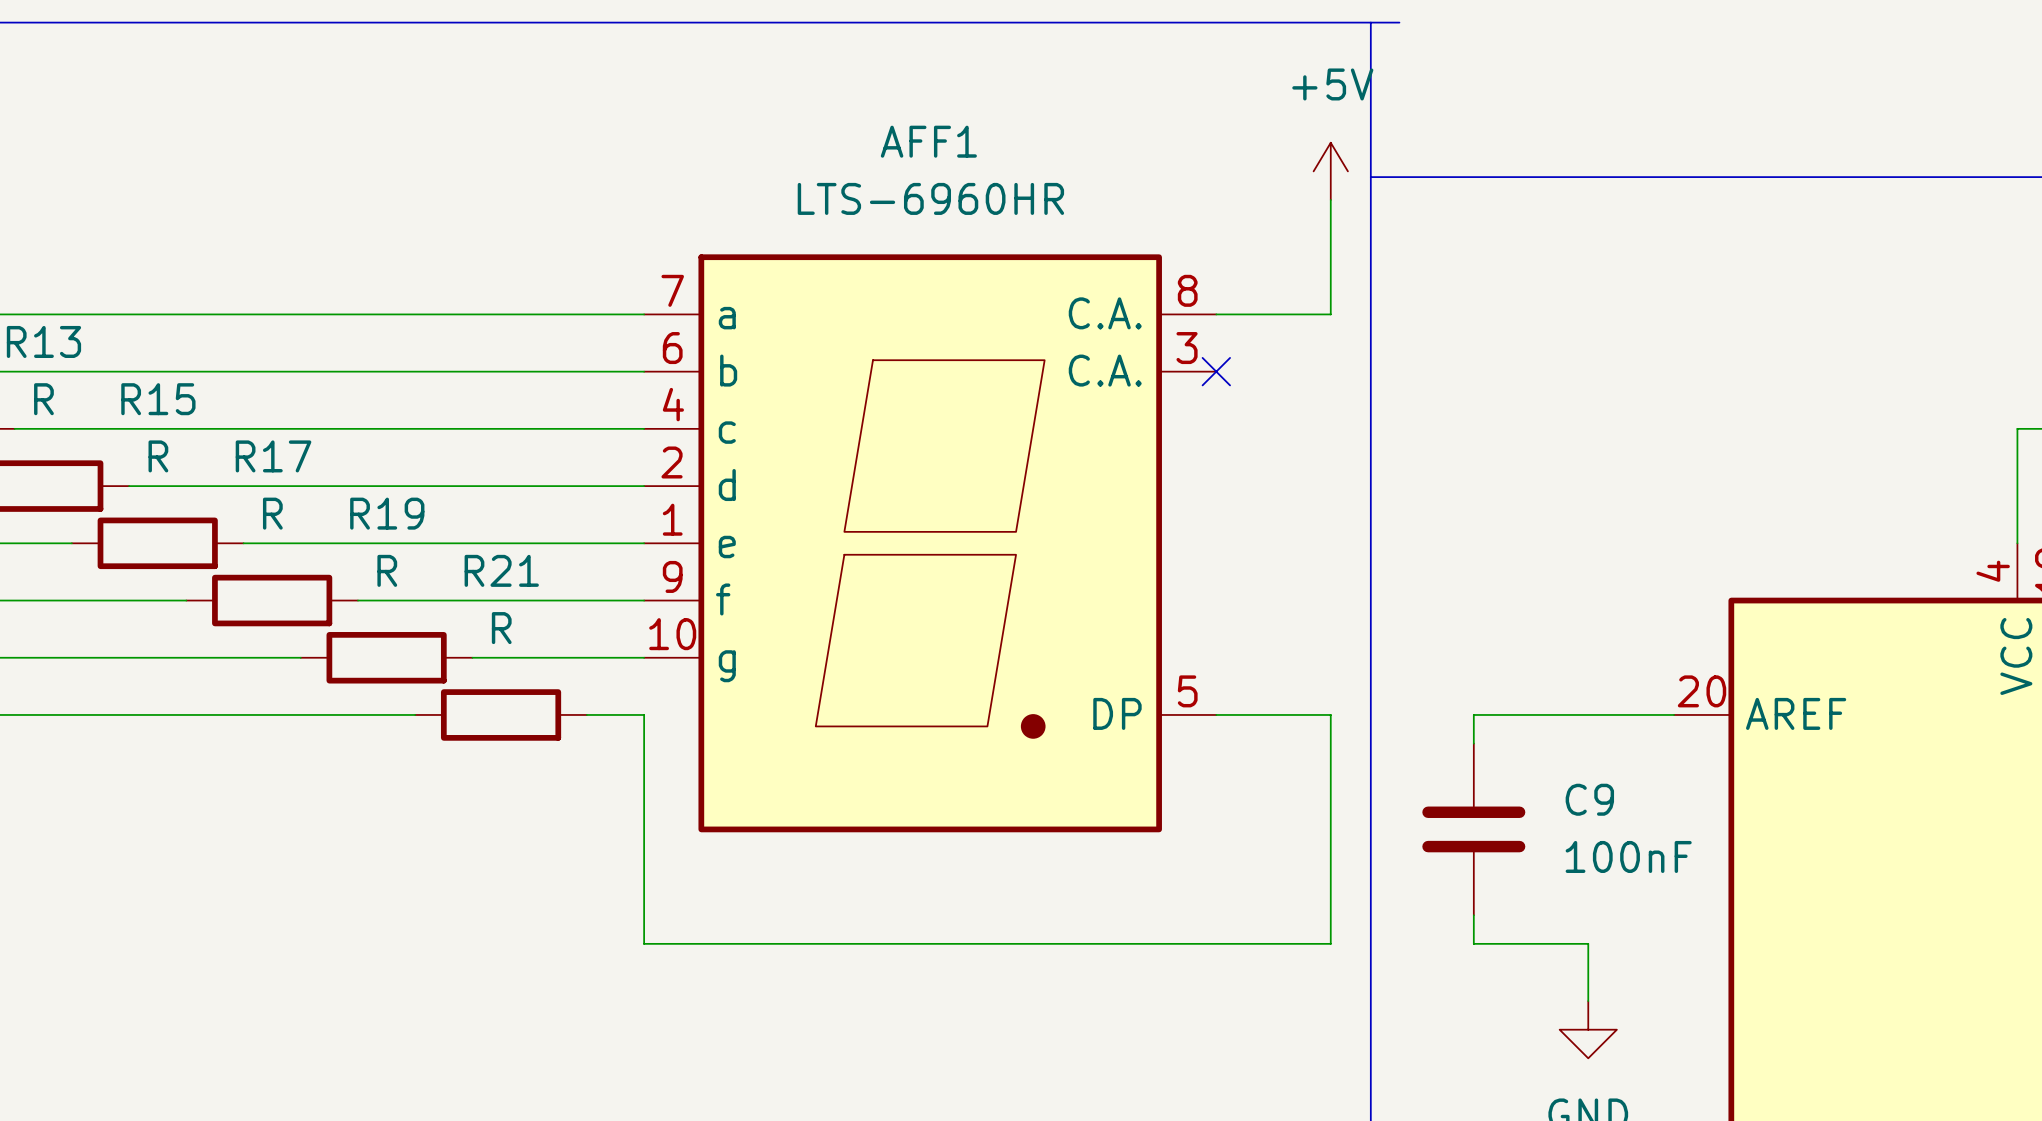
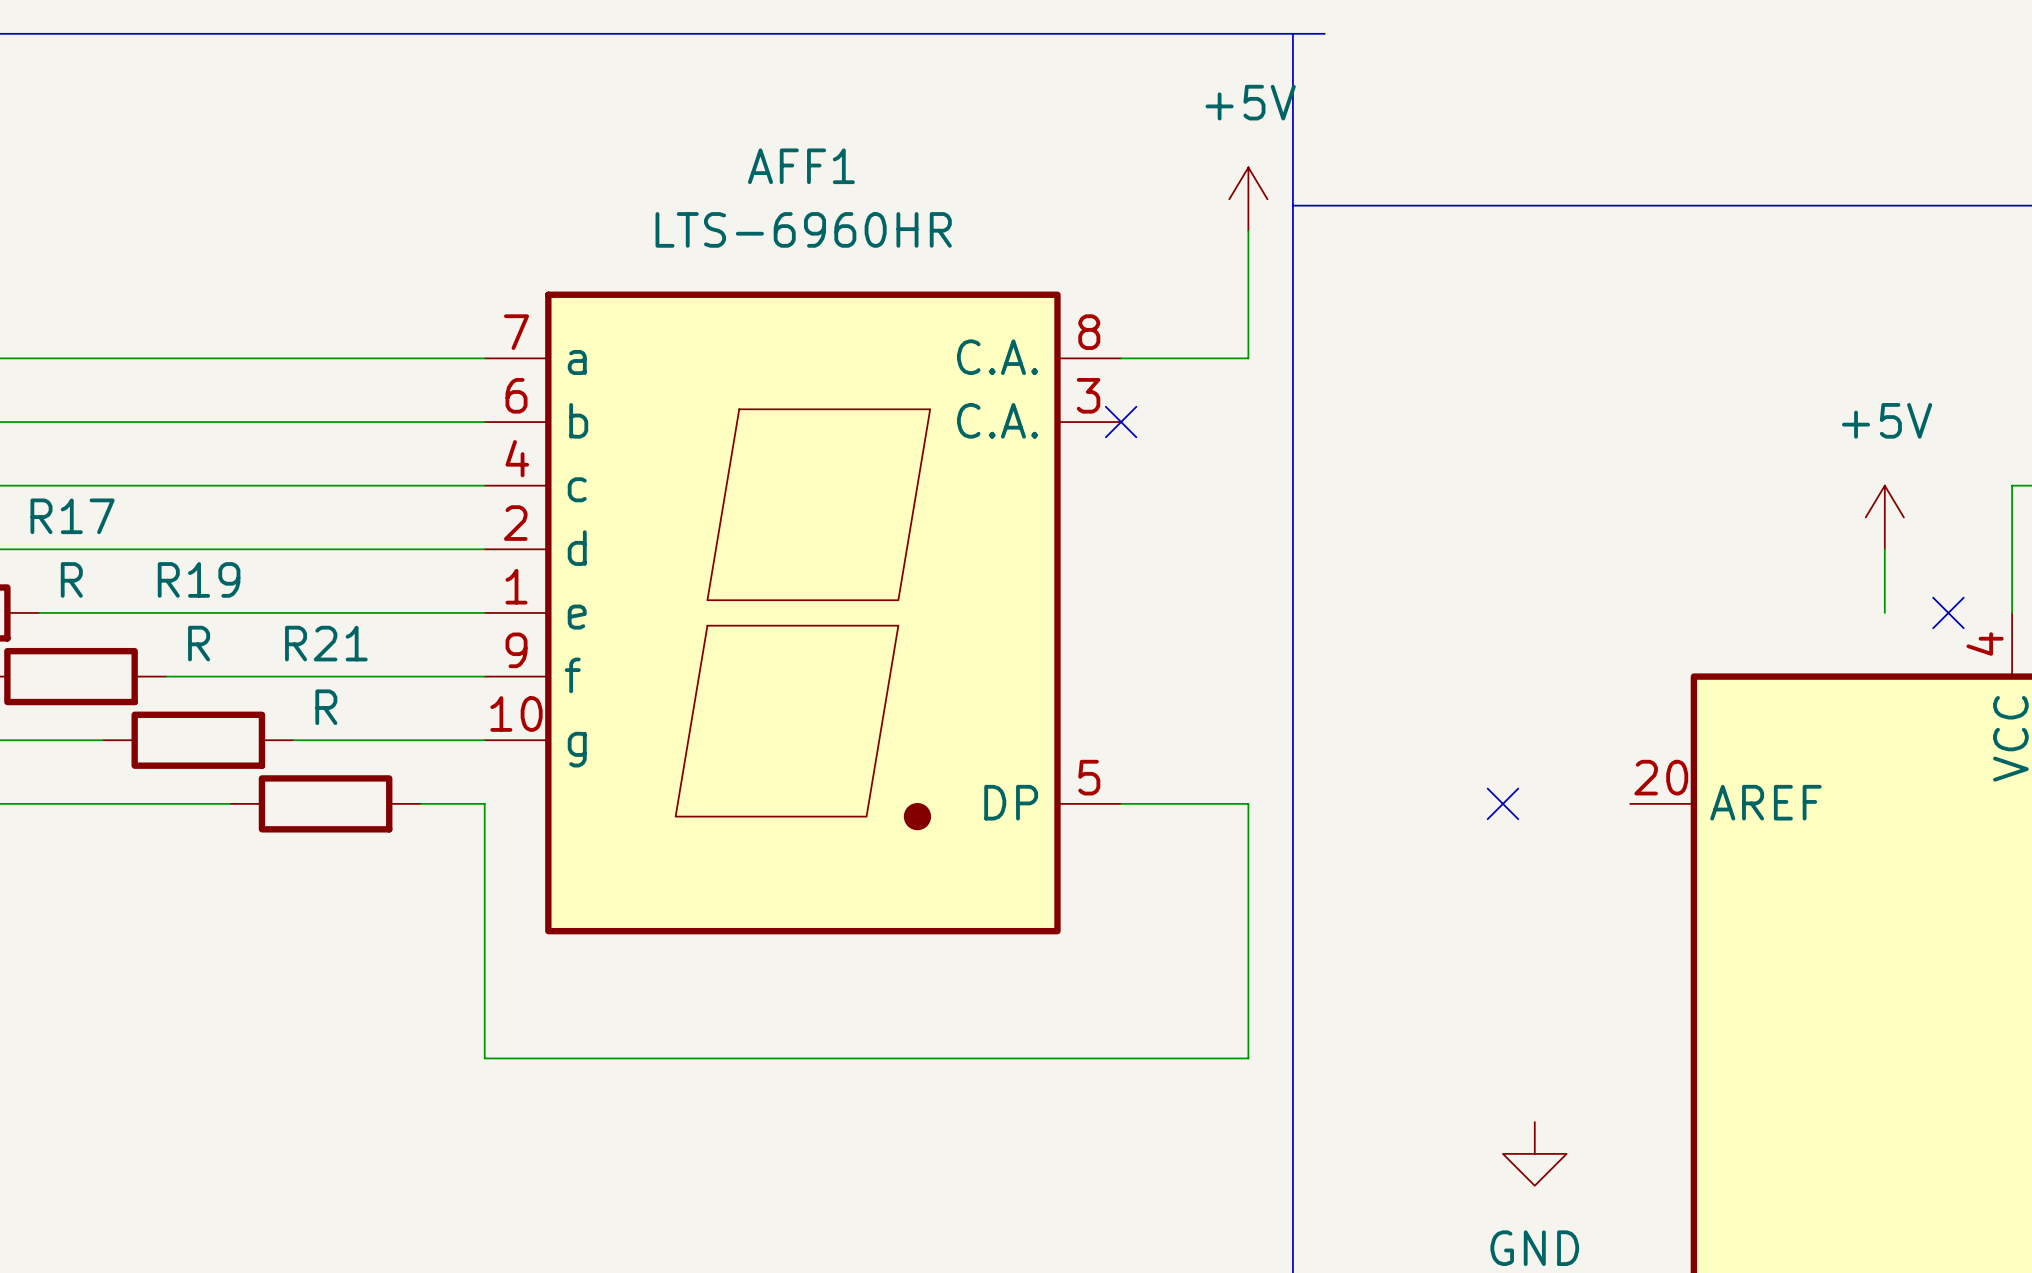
power symbol: none -> +5V (1884, 517)
wire: none -> (1884, 549) (1884, 612)
no-connect mark: none -> (1948, 612)
no-connect mark: none -> (1502, 803)
wire: (1674, 714) (1473, 714) (1473, 743) -> none
C9: 100nF (1473, 829) -> none
wire: (1473, 915) (1473, 943) (1588, 943) (1588, 1001) -> none

